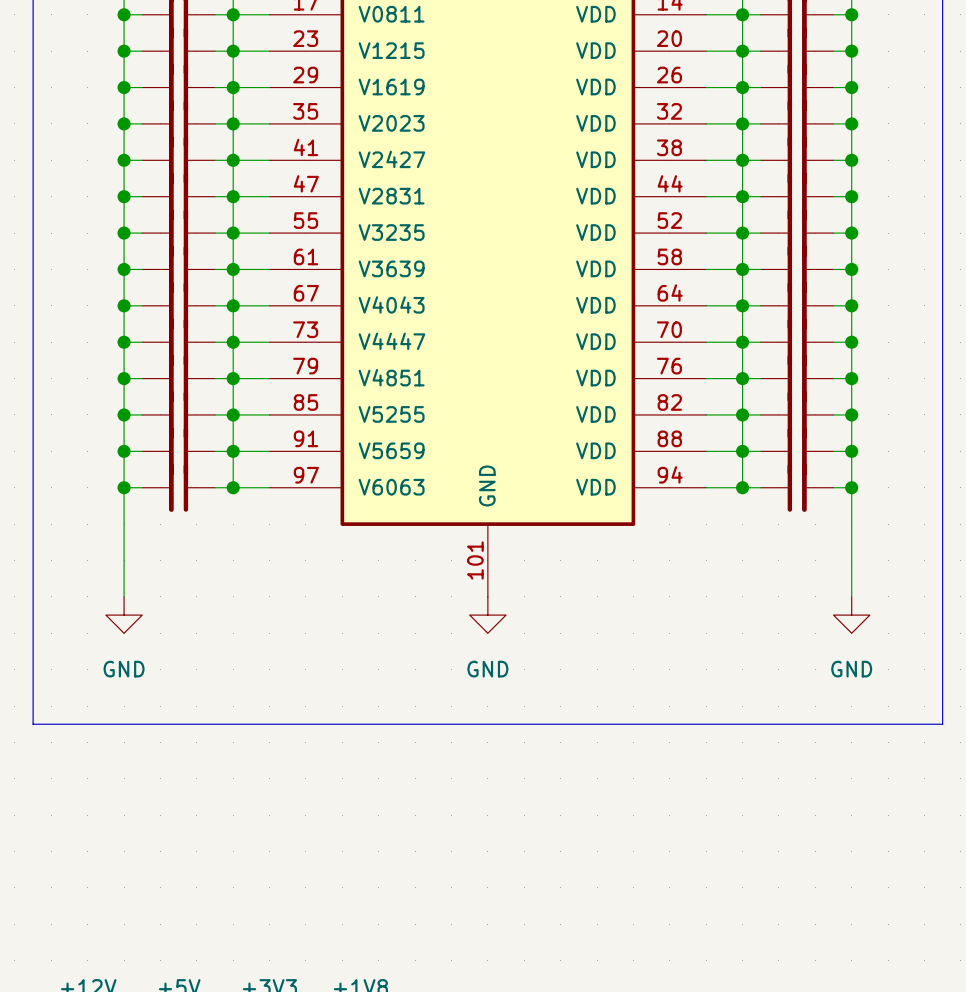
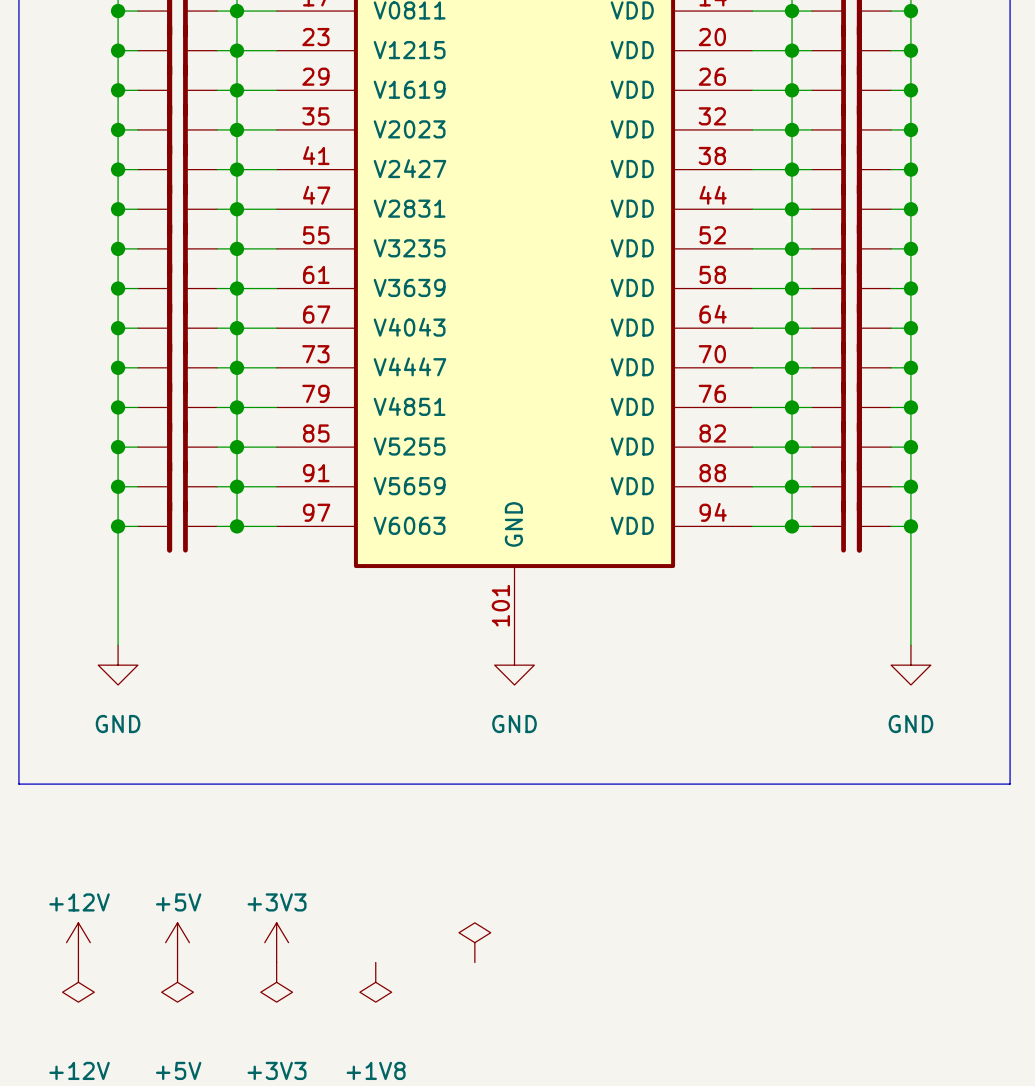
power symbol: none -> +12V (78, 942)
power symbol: none -> +5V (177, 942)
power symbol: none -> +3V3 (276, 942)
power symbol: none -> (474, 942)
power symbol: none -> (78, 982)
power symbol: none -> (177, 982)
power symbol: none -> (276, 982)
power symbol: none -> (375, 982)

